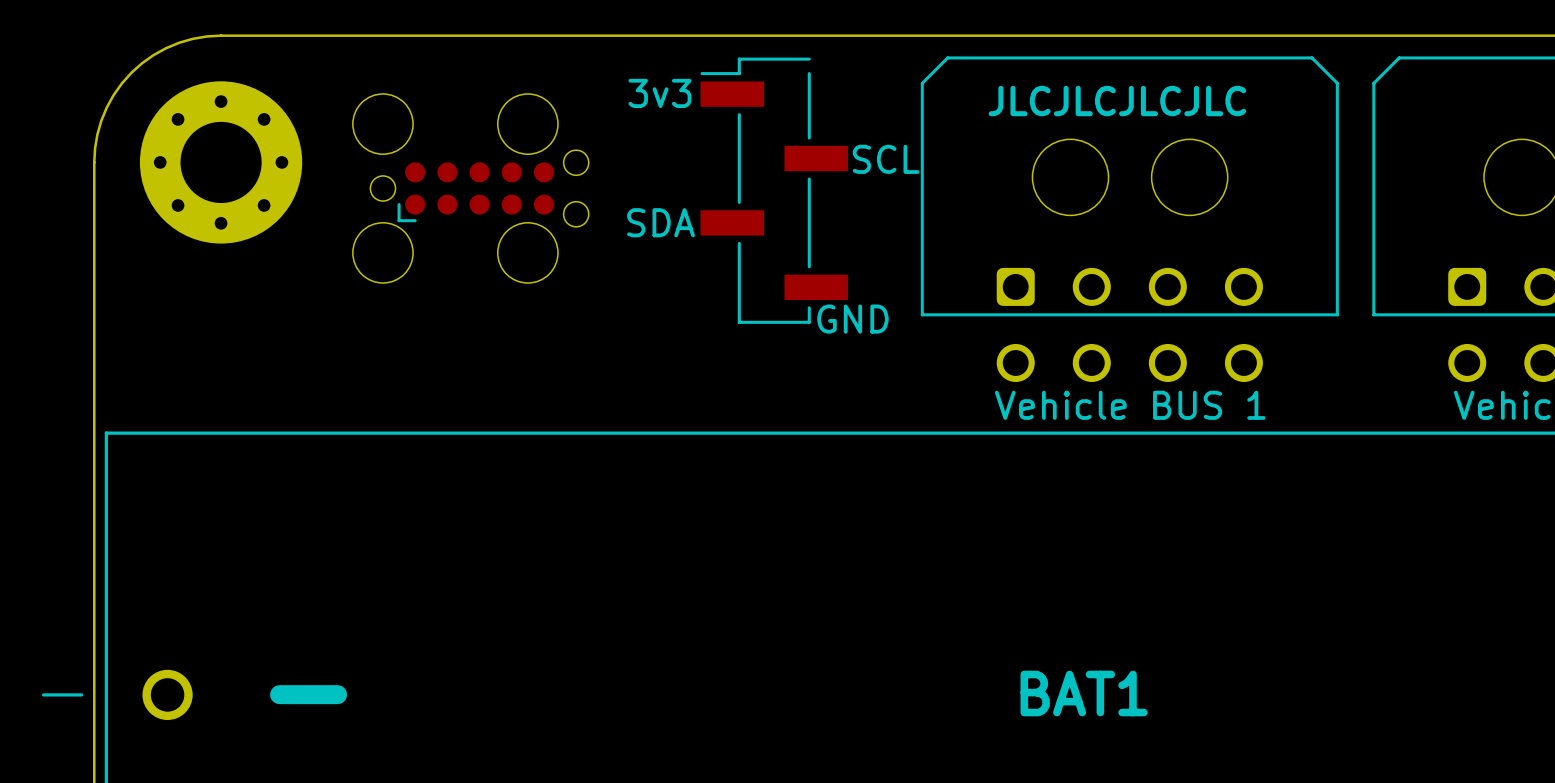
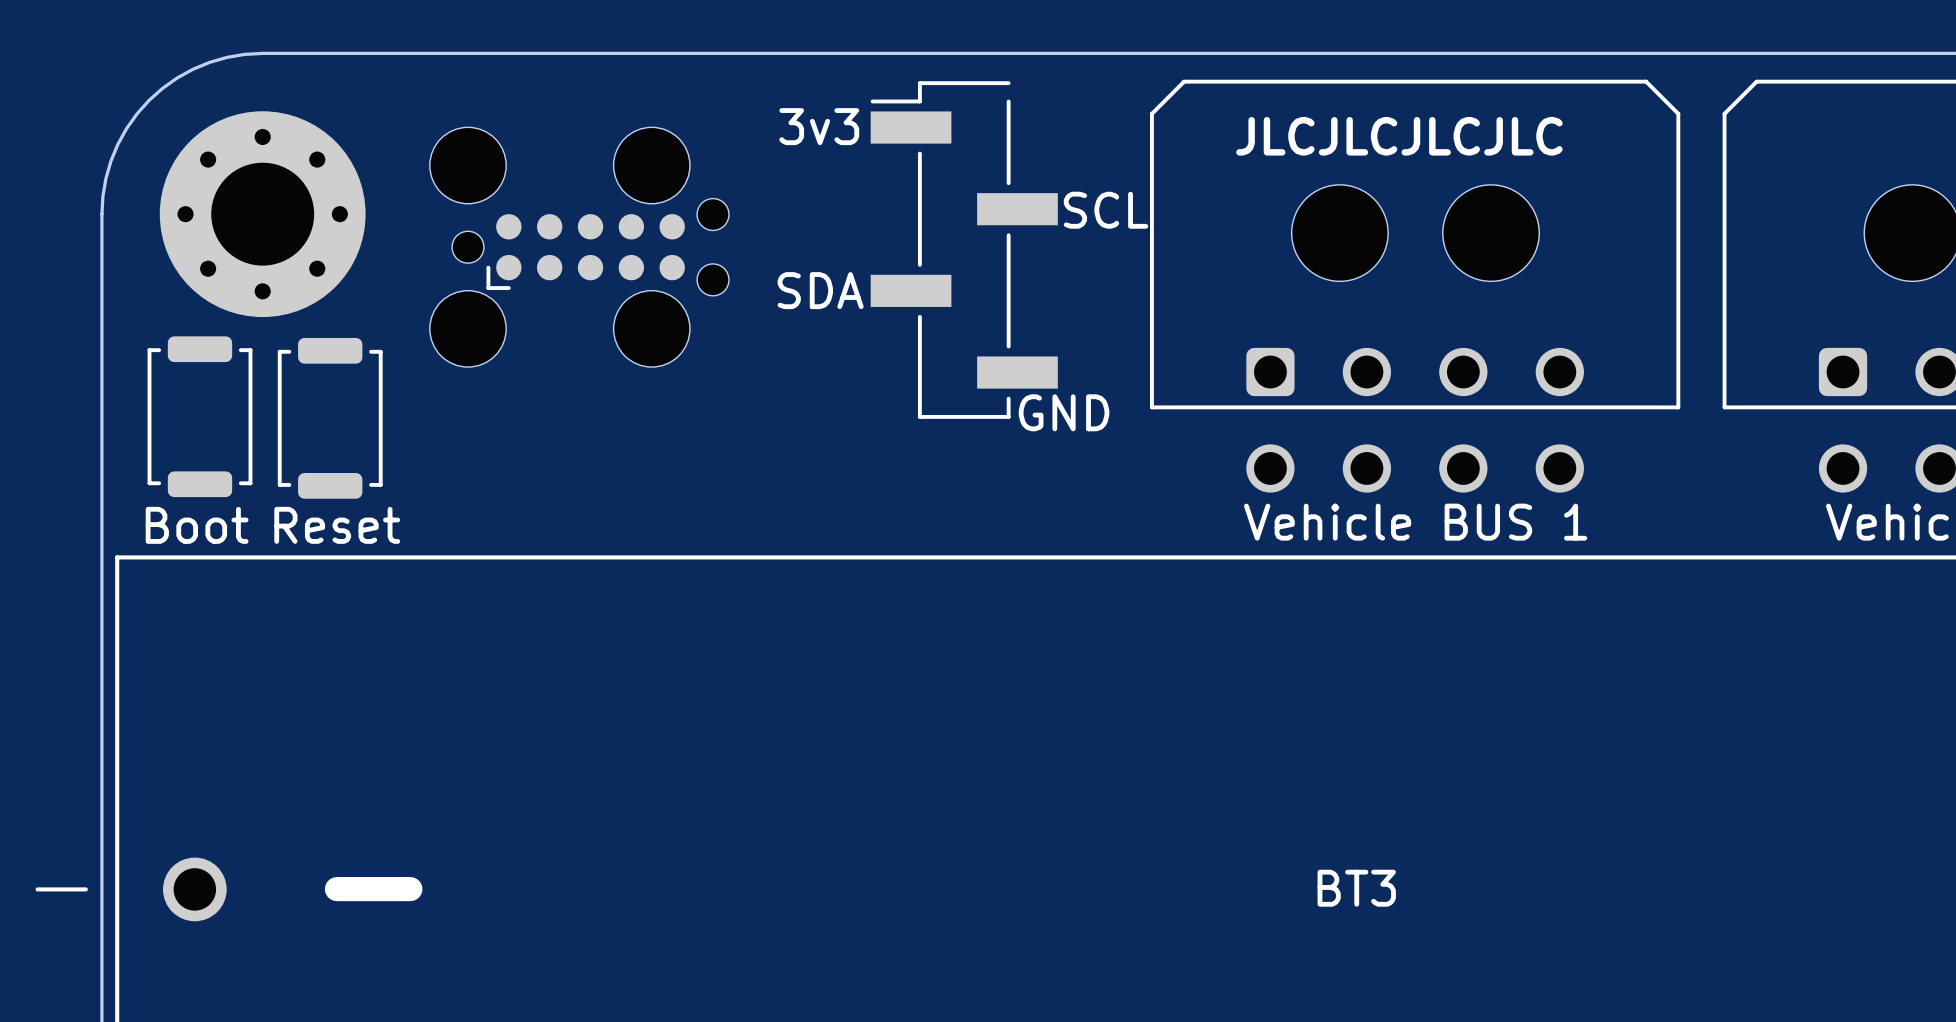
part: none -> (199, 416)
part: none -> (330, 418)
text: none -> Boot (197, 525)
text: none -> Reset (337, 525)
BAT1 name: BAT1 (1084, 693) -> BT3 (1356, 888)

